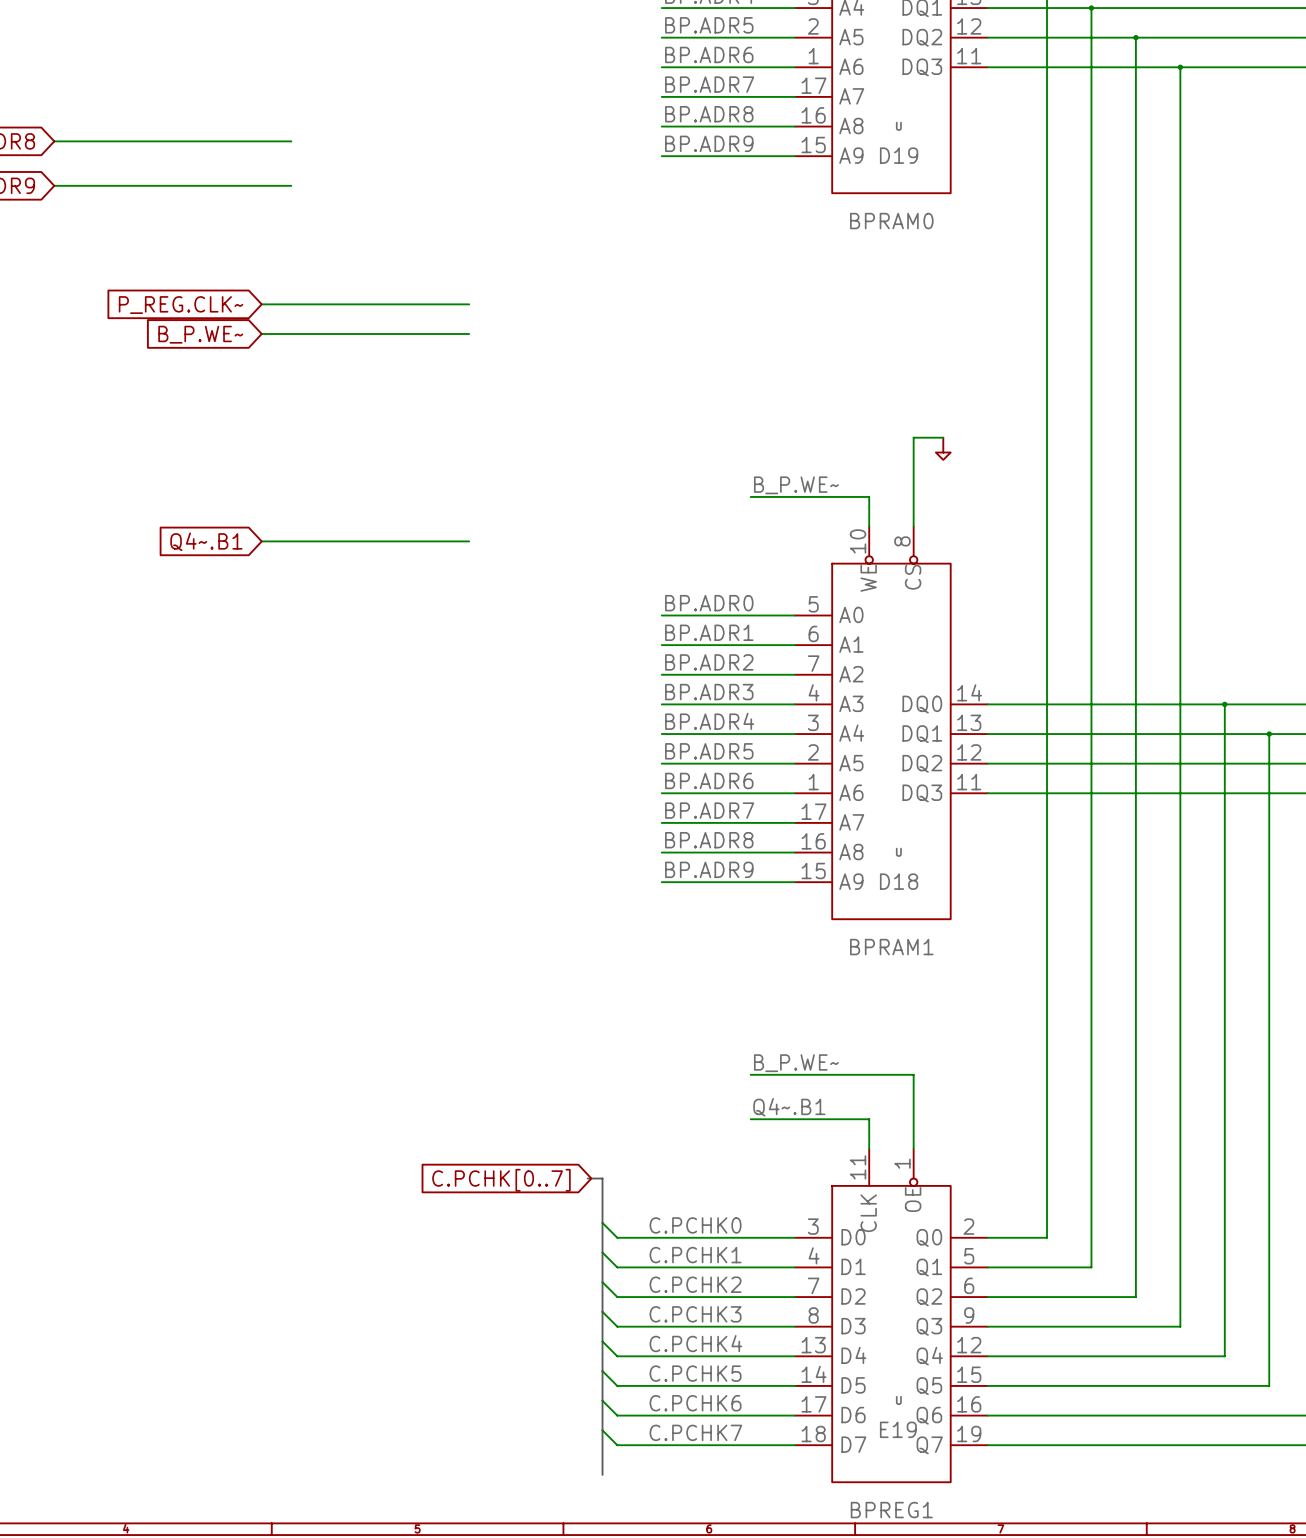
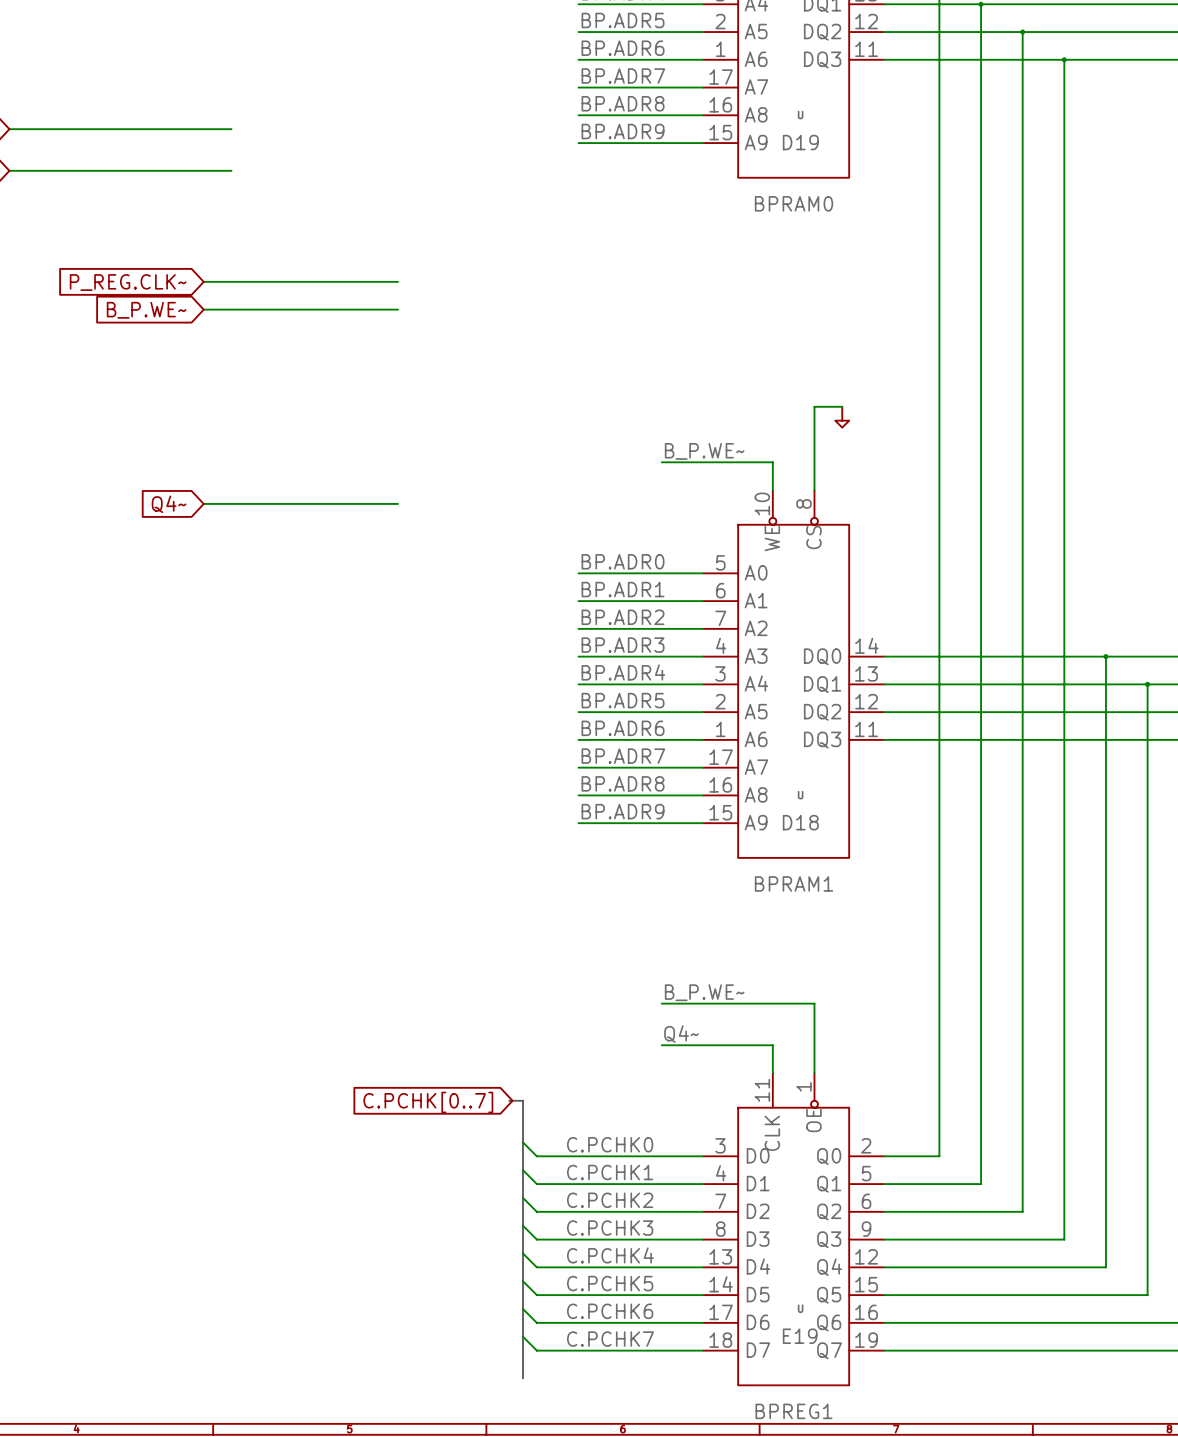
global label: Q4~.B1 (206, 541) -> Q4~ (169, 504)
label: Q4~.B1 (789, 1107) -> Q4~ (681, 1034)

